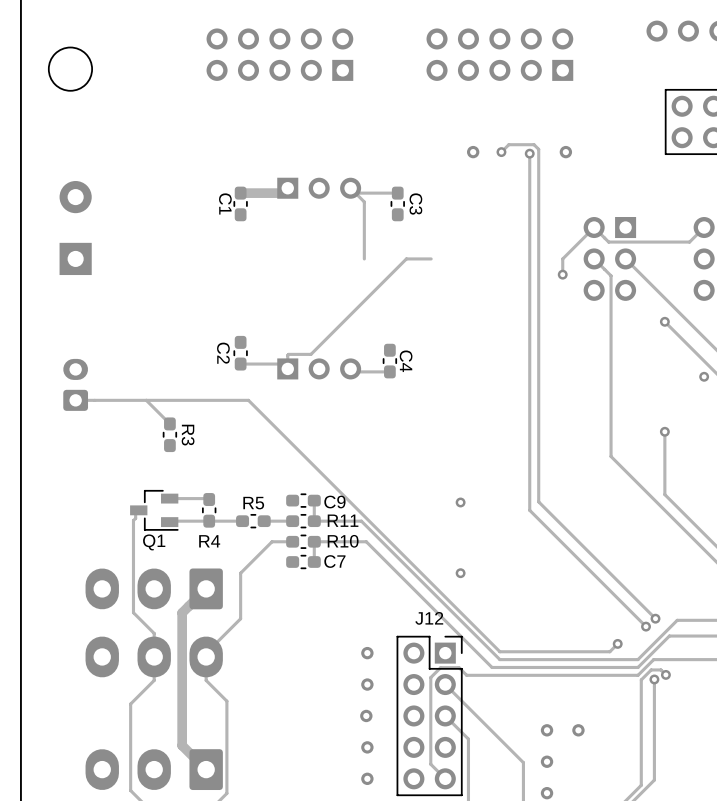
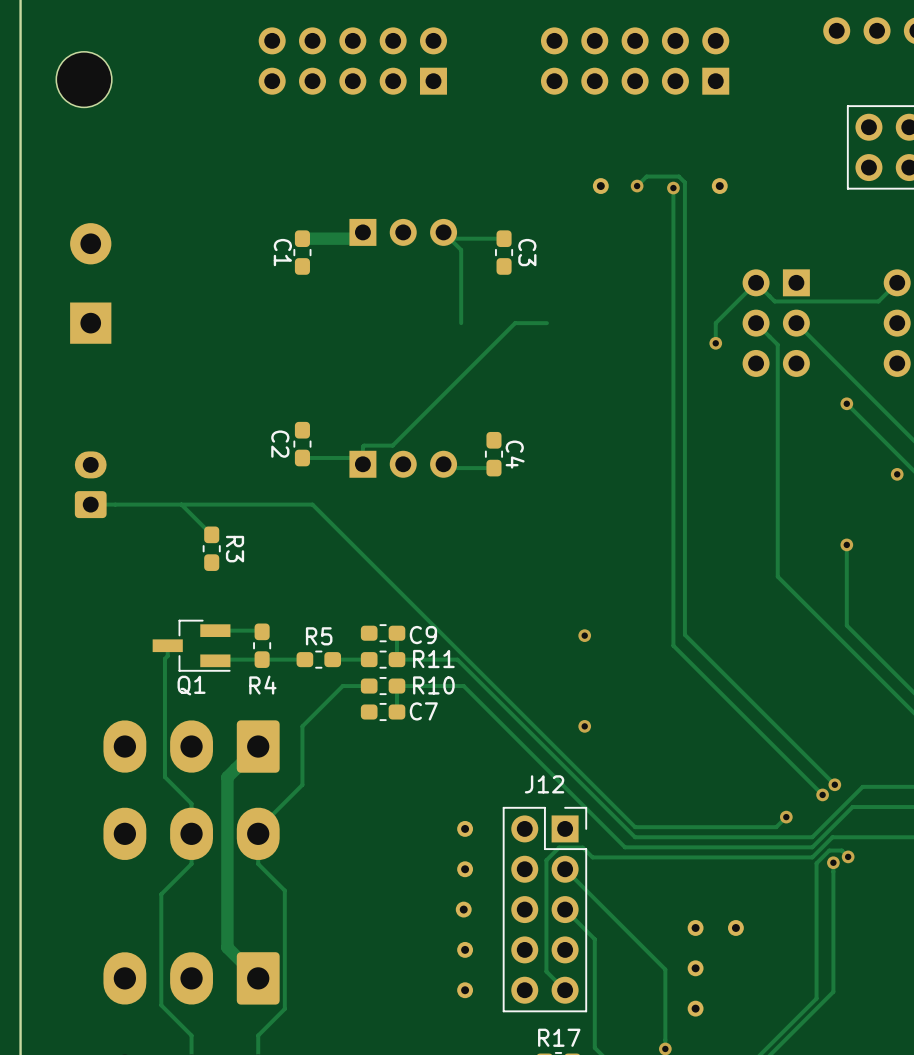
Q1 footprint: [130, 490, 179, 531] -> [152, 619, 231, 672]

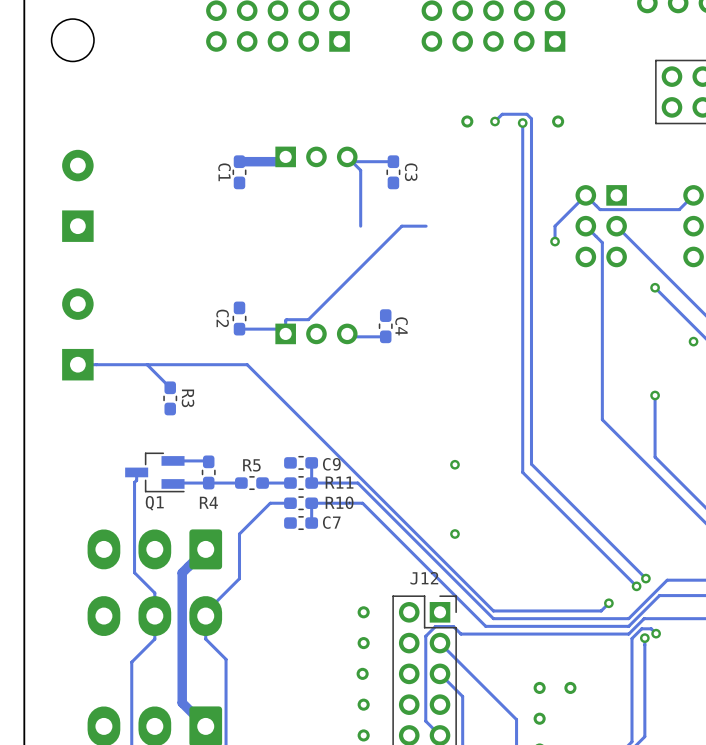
part: none -> (77, 334)
part: (90, 484) -> none

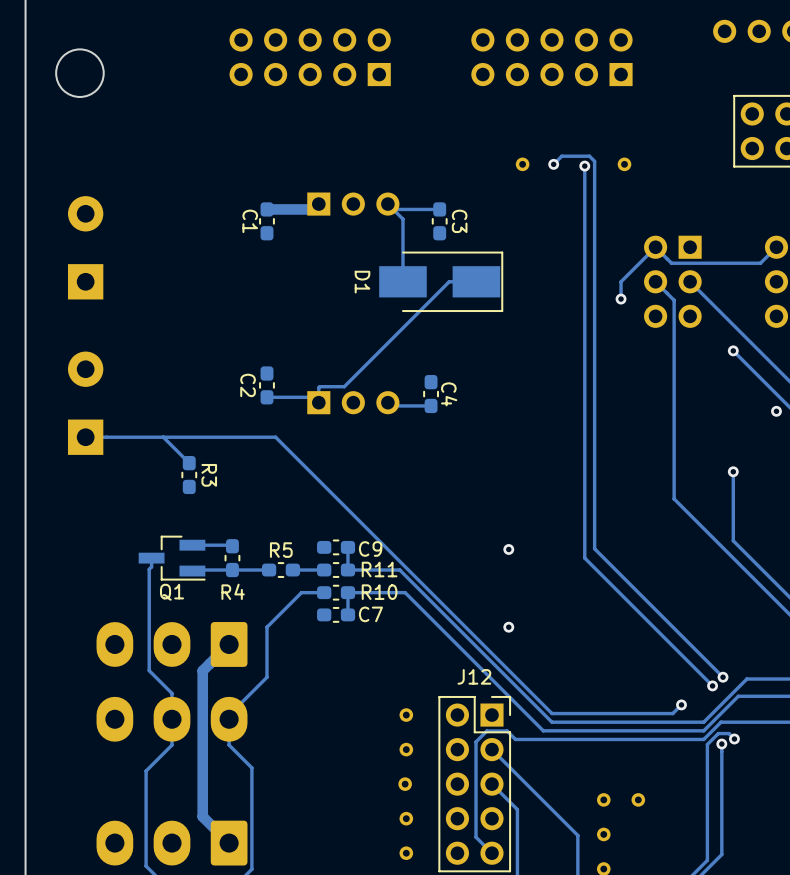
D1: none -> (441, 281)

